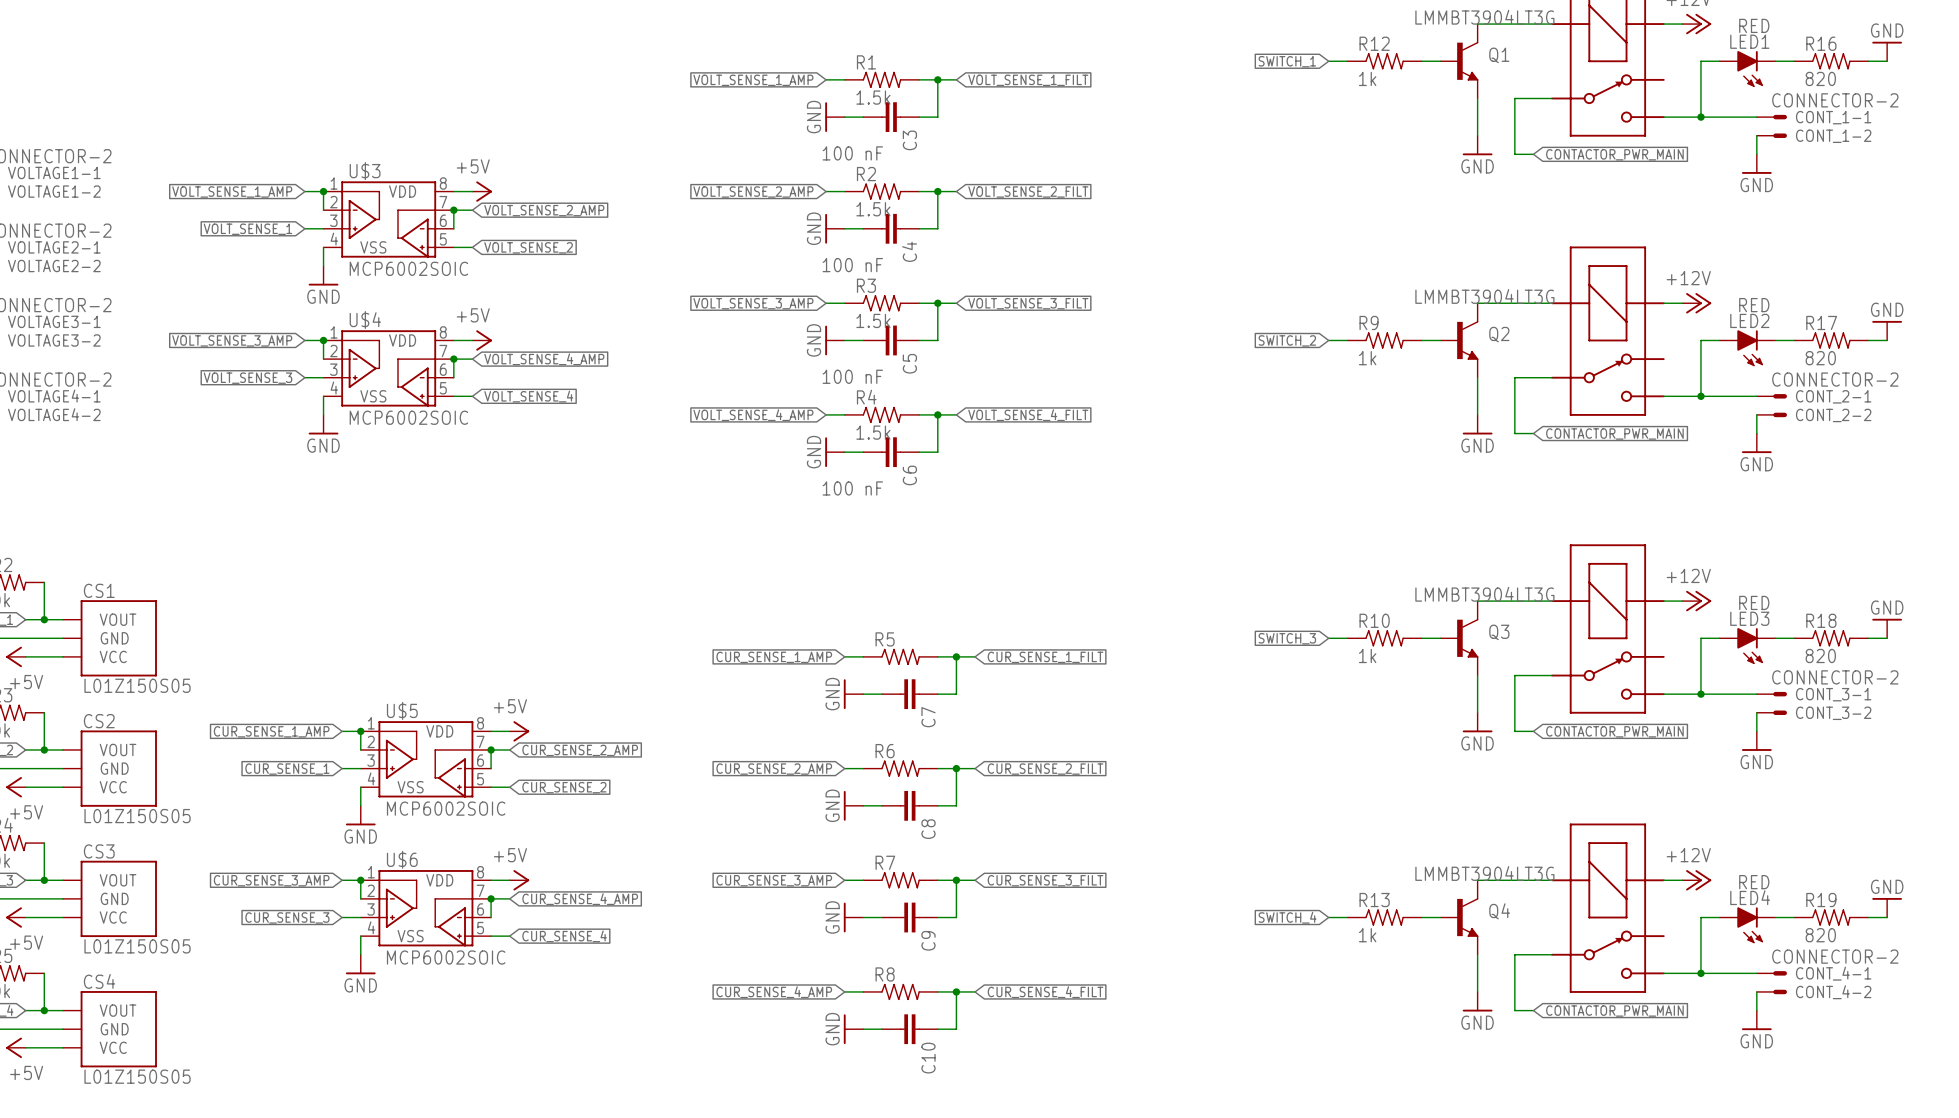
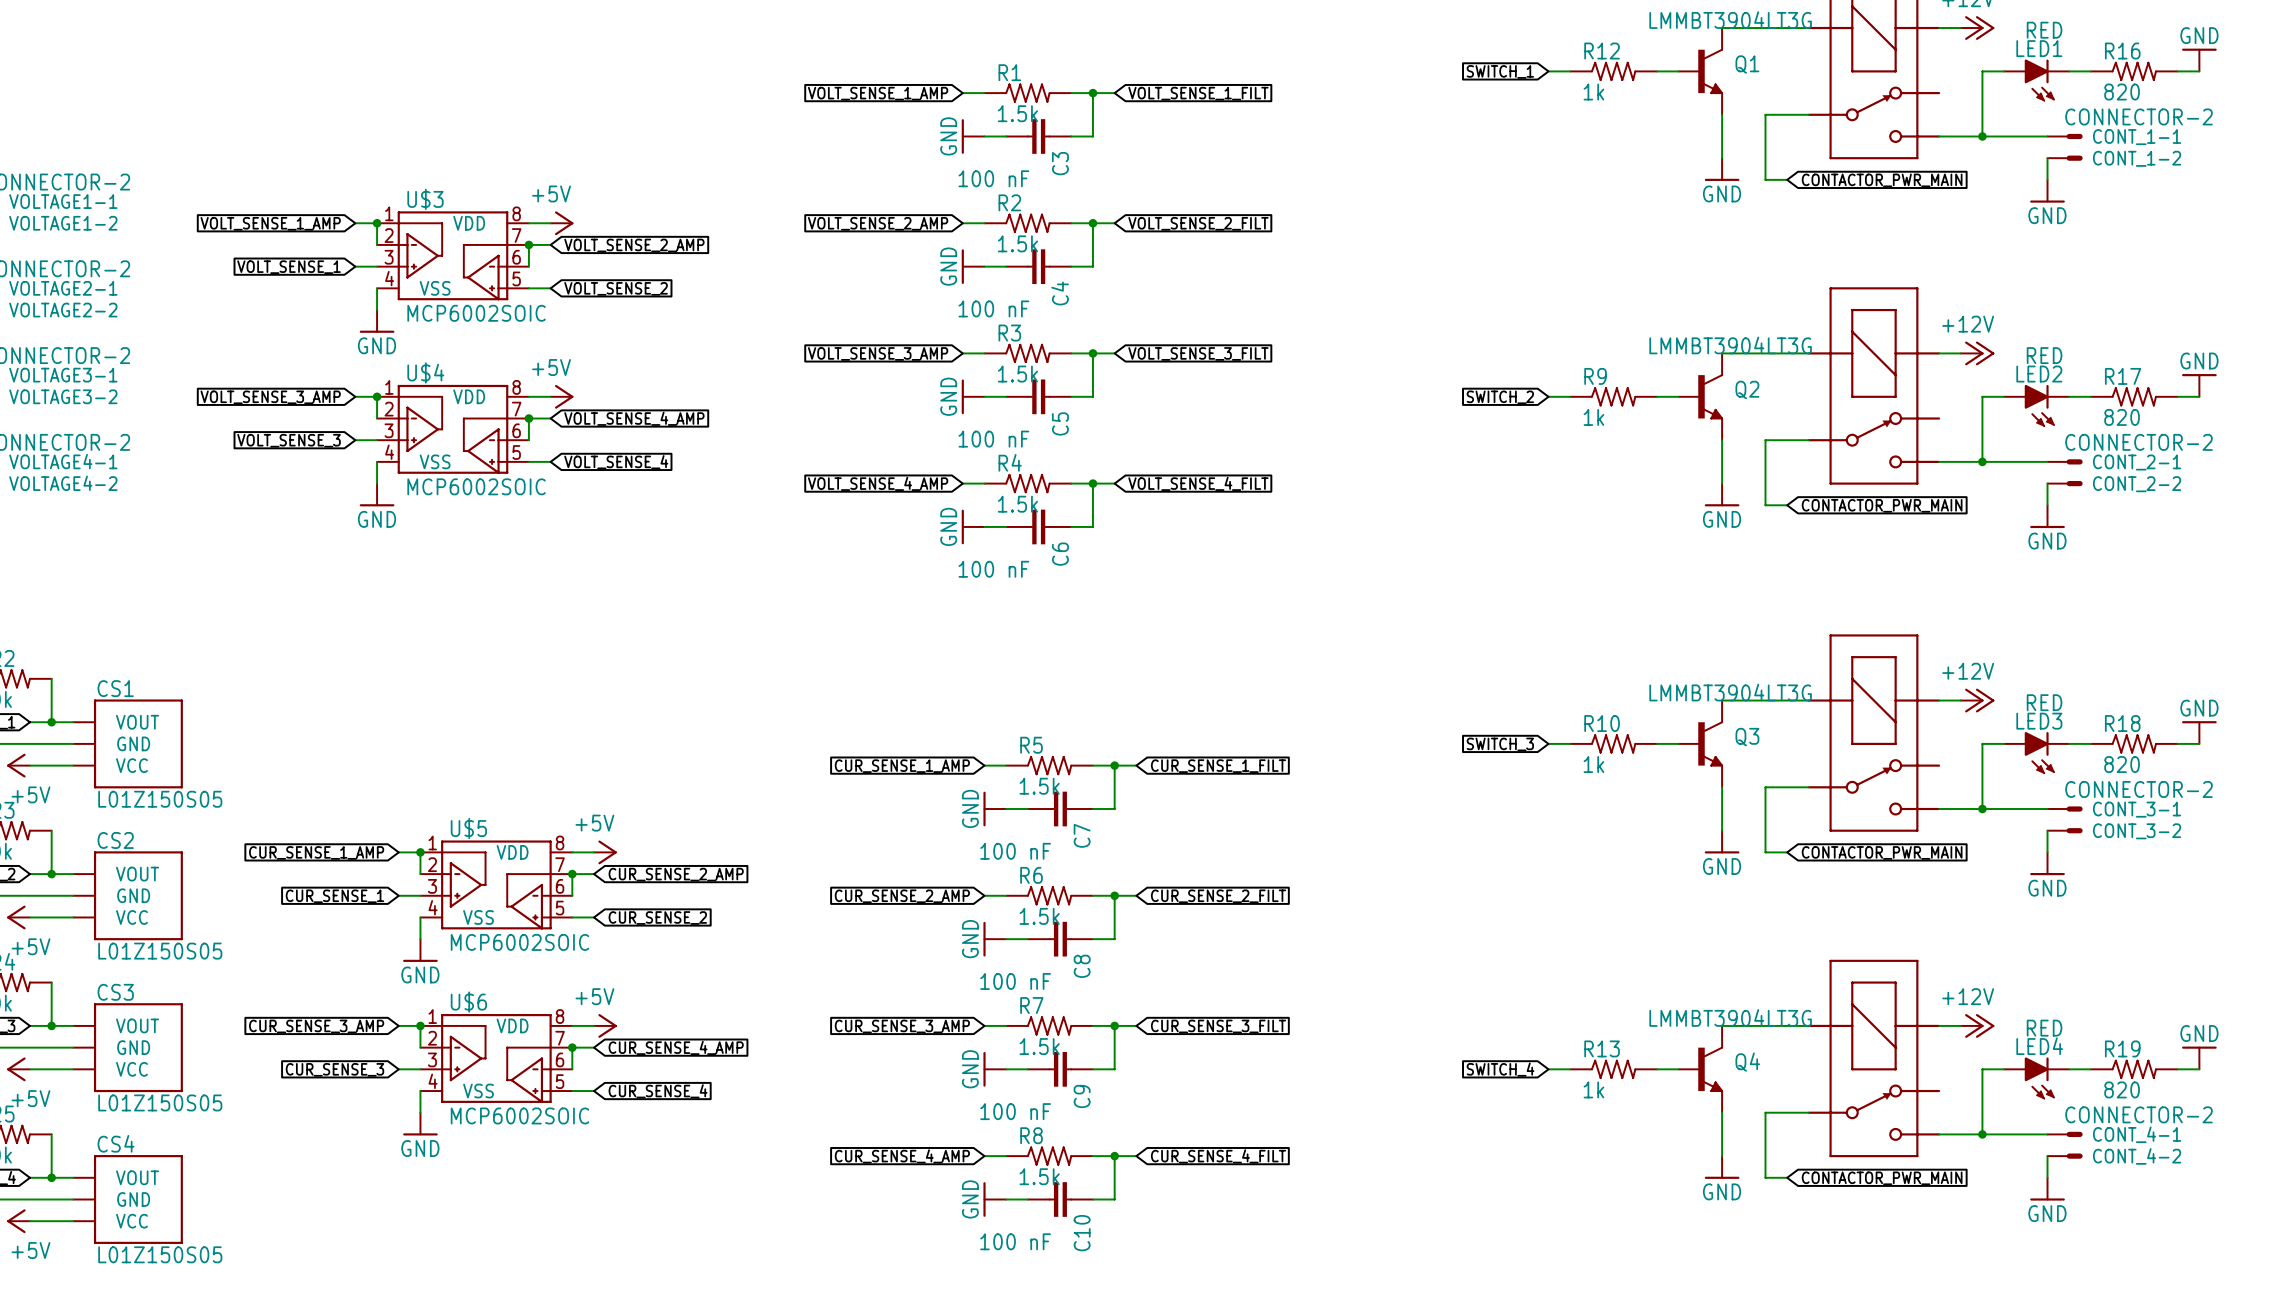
R5 value: none -> 1.5k (1039, 786)
C7 value: none -> 100 nF (1015, 851)
R6 value: none -> 1.5k (1039, 916)
C8 value: none -> 100 nF (1015, 981)
R7 value: none -> 1.5k (1039, 1046)
C9 value: none -> 100 nF (1015, 1111)
R8 value: none -> 1.5k (1039, 1176)
C10 value: none -> 100 nF (1015, 1241)

